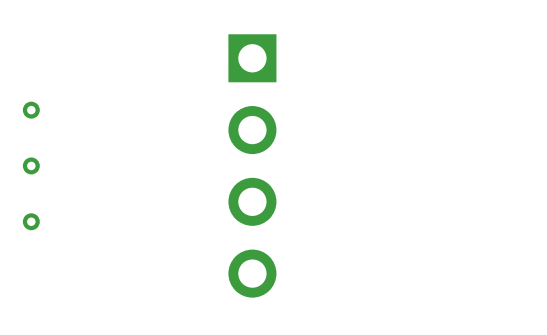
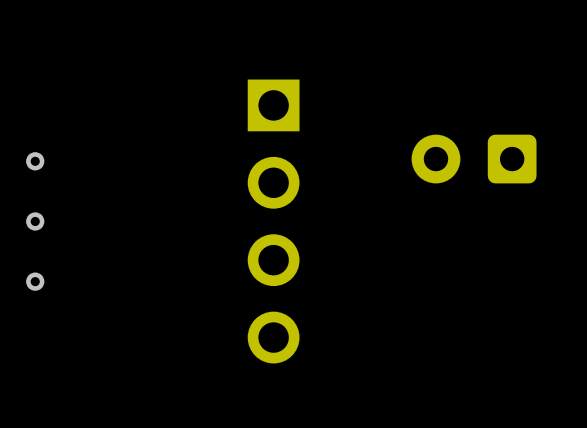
part: none -> (474, 159)

